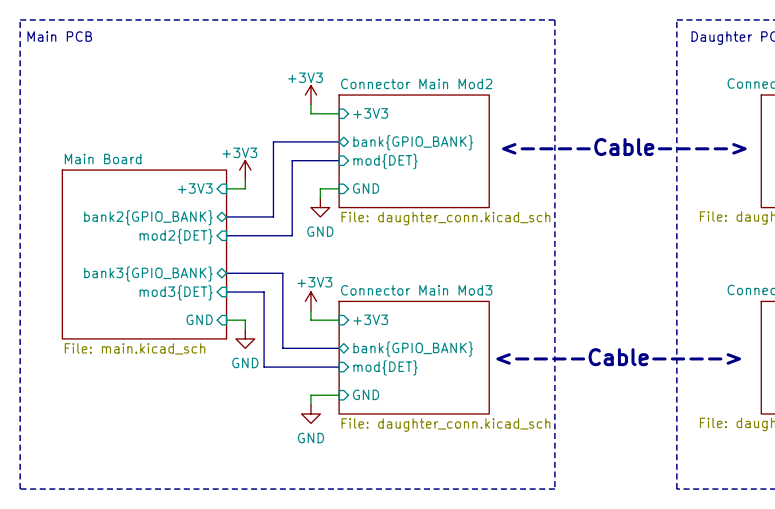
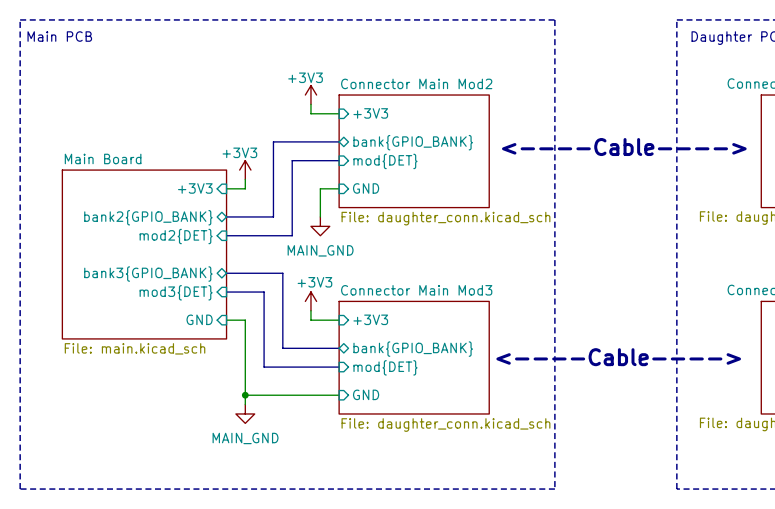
power symbol: GND (320, 207) -> none
power symbol: none -> MAIN_GND (320, 226)
wire: none -> (245, 329) (245, 404)
power symbol: GND (245, 338) -> none
junction: none -> (245, 395)
wire: (310, 395) (310, 404) -> (310, 395) (245, 395)
power symbol: none -> MAIN_GND (245, 413)
power symbol: GND (310, 413) -> none

